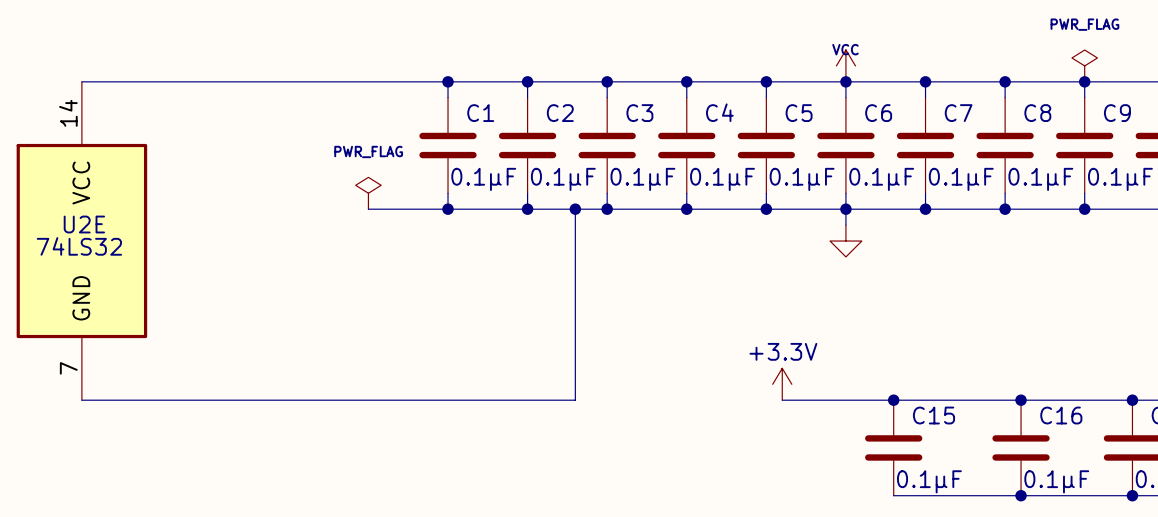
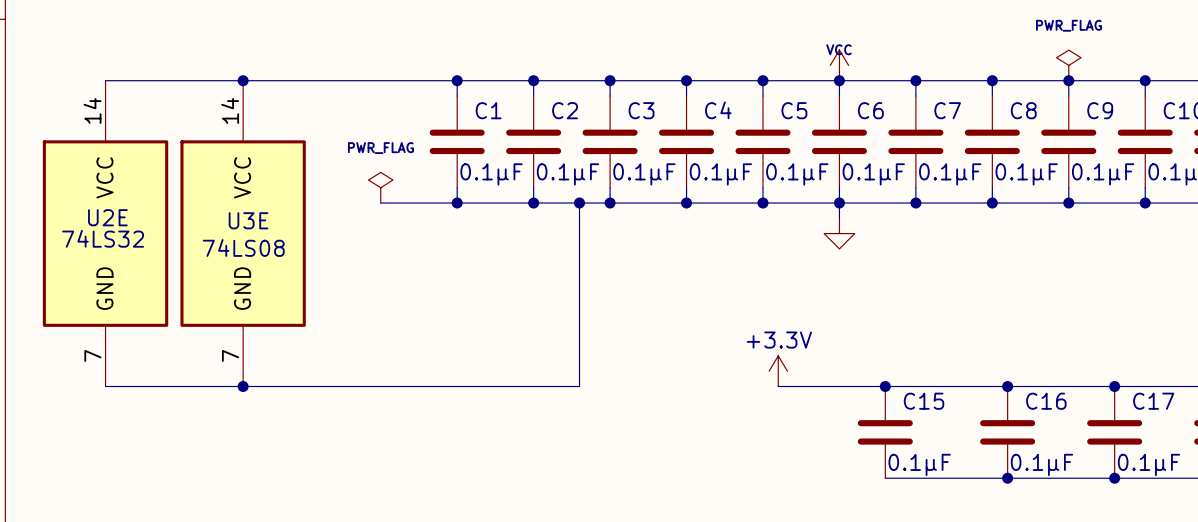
junction: none -> (243, 80)
U3E: none -> 74LS08 (243, 233)
junction: none -> (243, 386)

